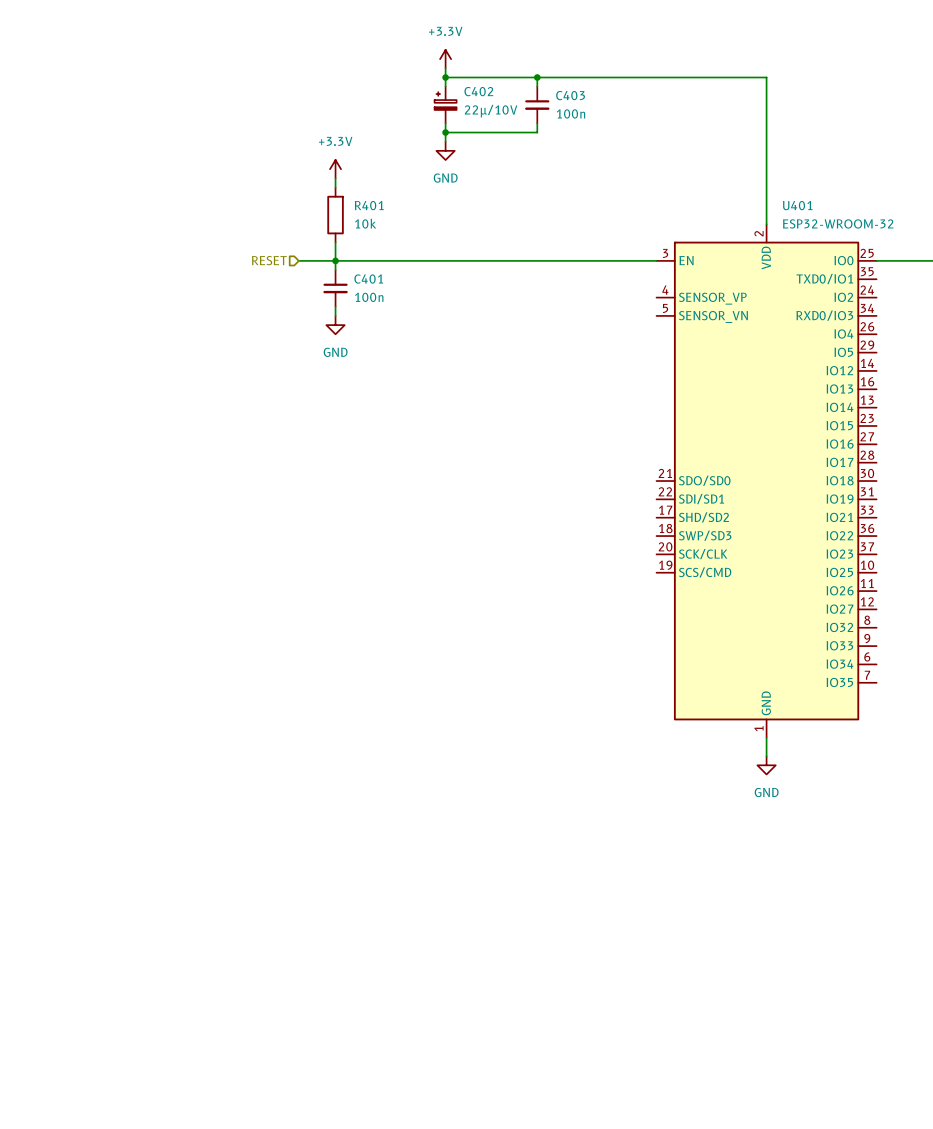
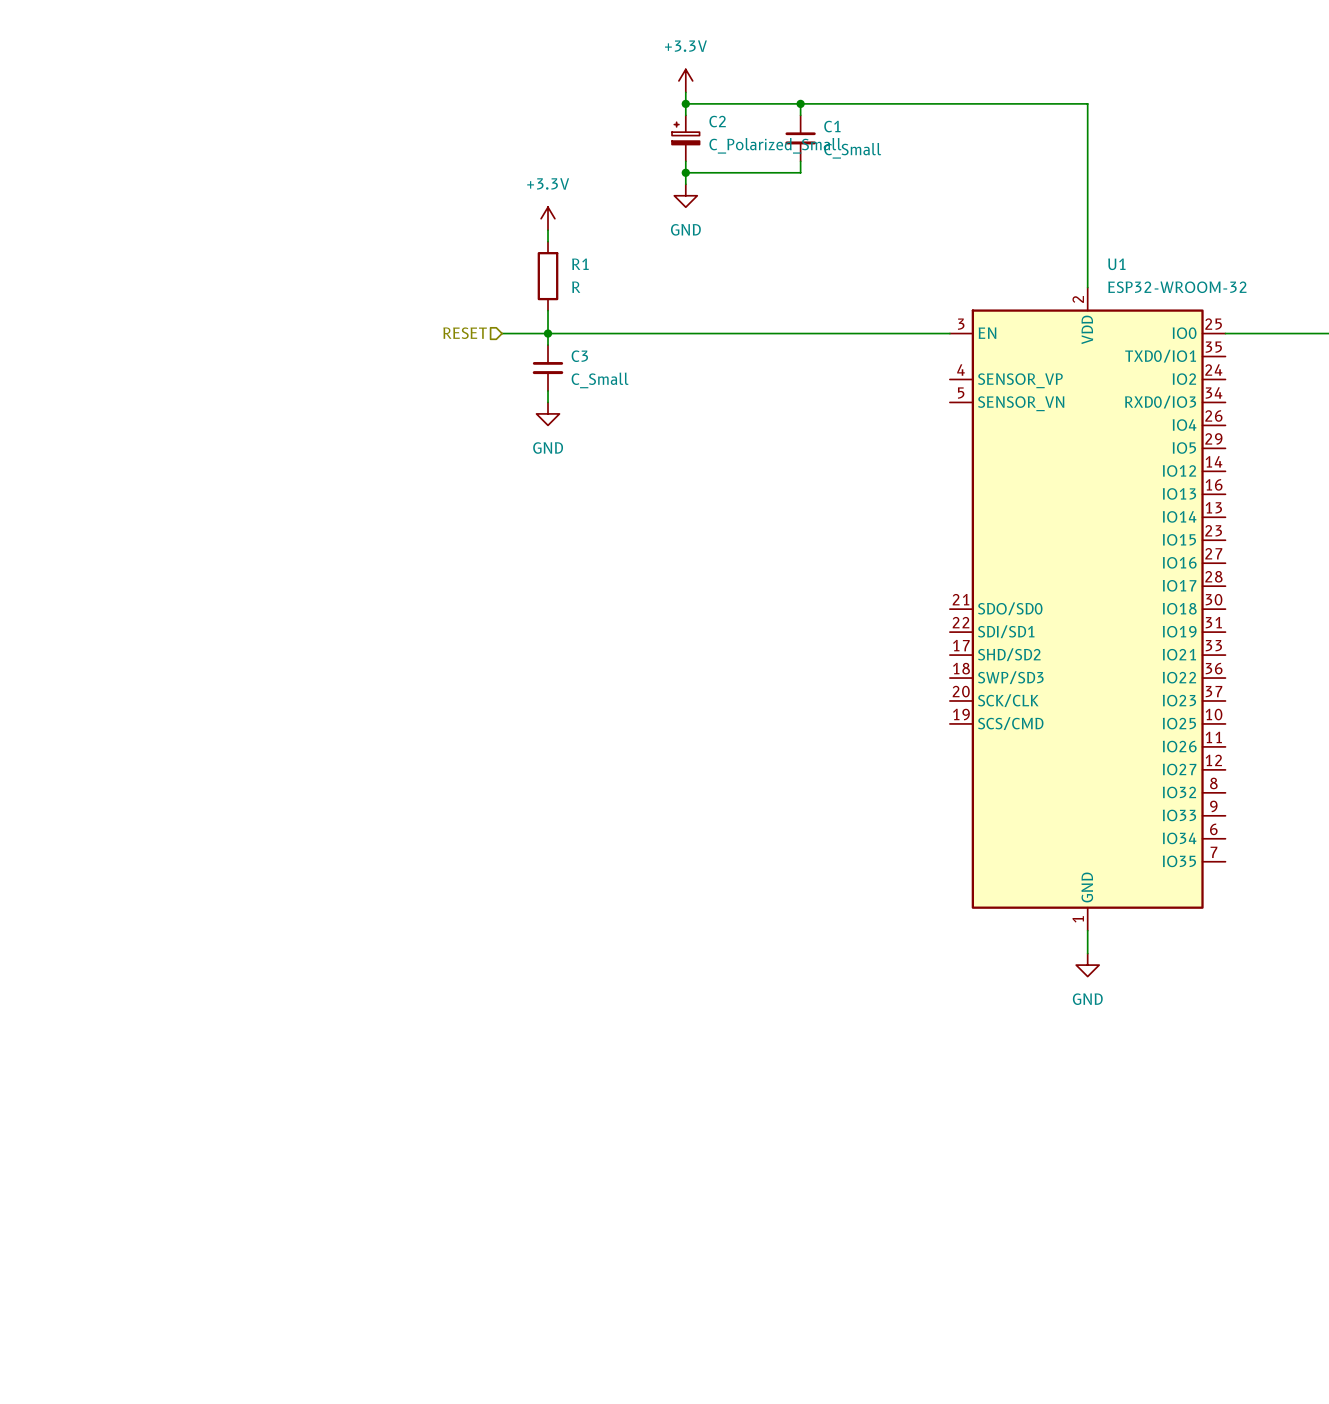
C402 name: C402 (478, 91) -> C2 (717, 121)
C403 name: C403 (570, 95) -> C1 (832, 126)
C402 value: 22µ/10V (491, 111) -> C_Polarized_Small (775, 145)
C403 value: 100n (571, 113) -> C_Small (852, 150)
R401 name: R401 (369, 205) -> R1 (580, 264)
U401 name: U401 (797, 205) -> U1 (1116, 264)
R401 value: 10k (365, 223) -> R (576, 287)
C401 name: C401 (368, 279) -> C3 (579, 356)
C401 value: 100n (369, 297) -> C_Small (600, 380)

